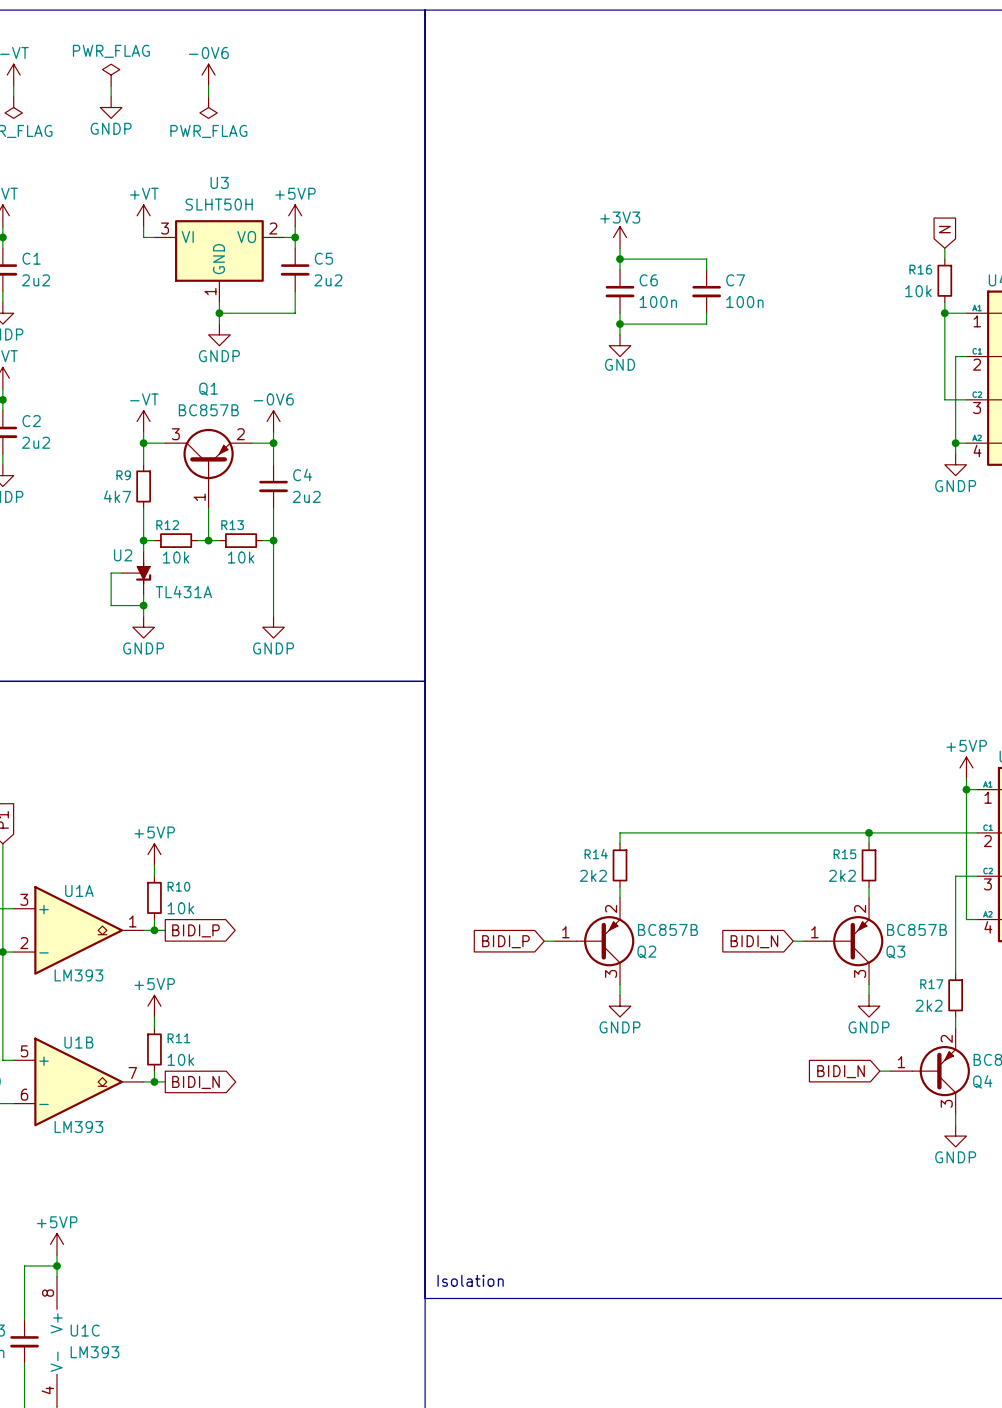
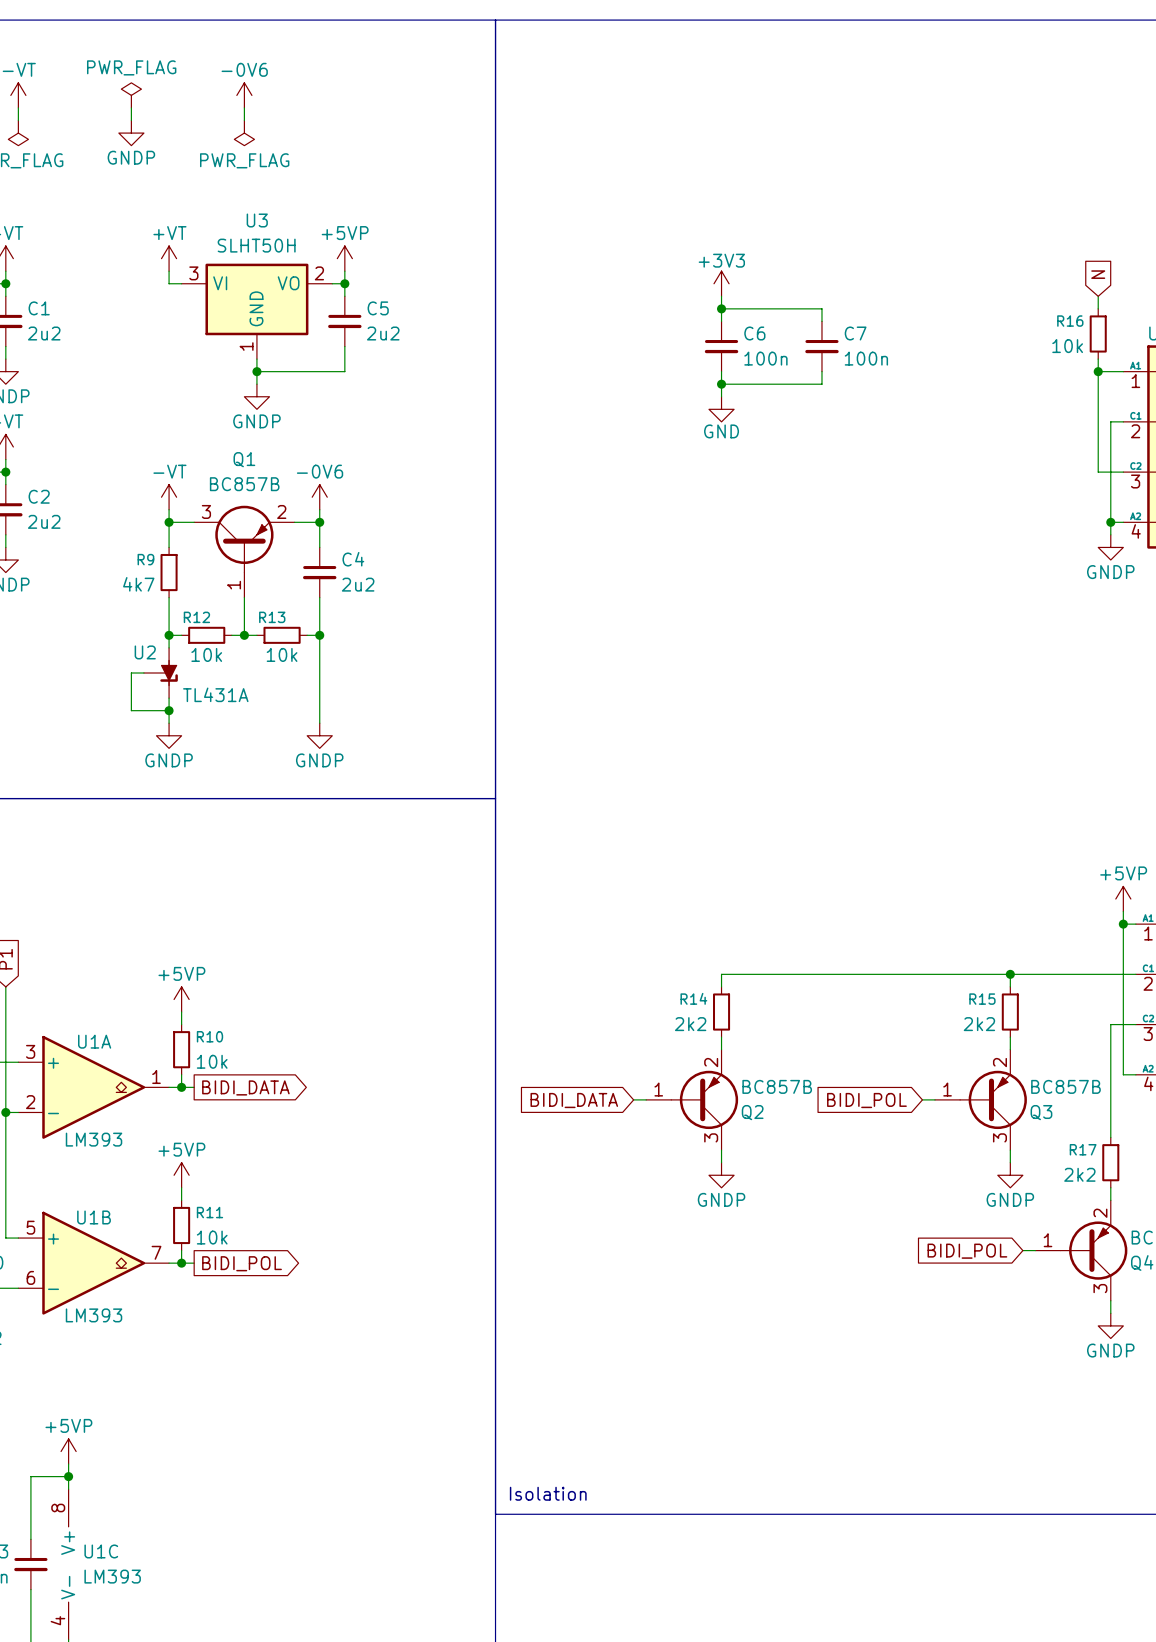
global label: BIDI_P (195, 930) -> BIDI_DATA (245, 1087)
global label: BIDI_P (505, 941) -> BIDI_DATA (574, 1100)
global label: BIDI_N (754, 941) -> BIDI_POL (866, 1100)
global label: BIDI_N (841, 1071) -> BIDI_POL (967, 1251)
global label: BIDI_N (195, 1082) -> BIDI_POL (242, 1263)

